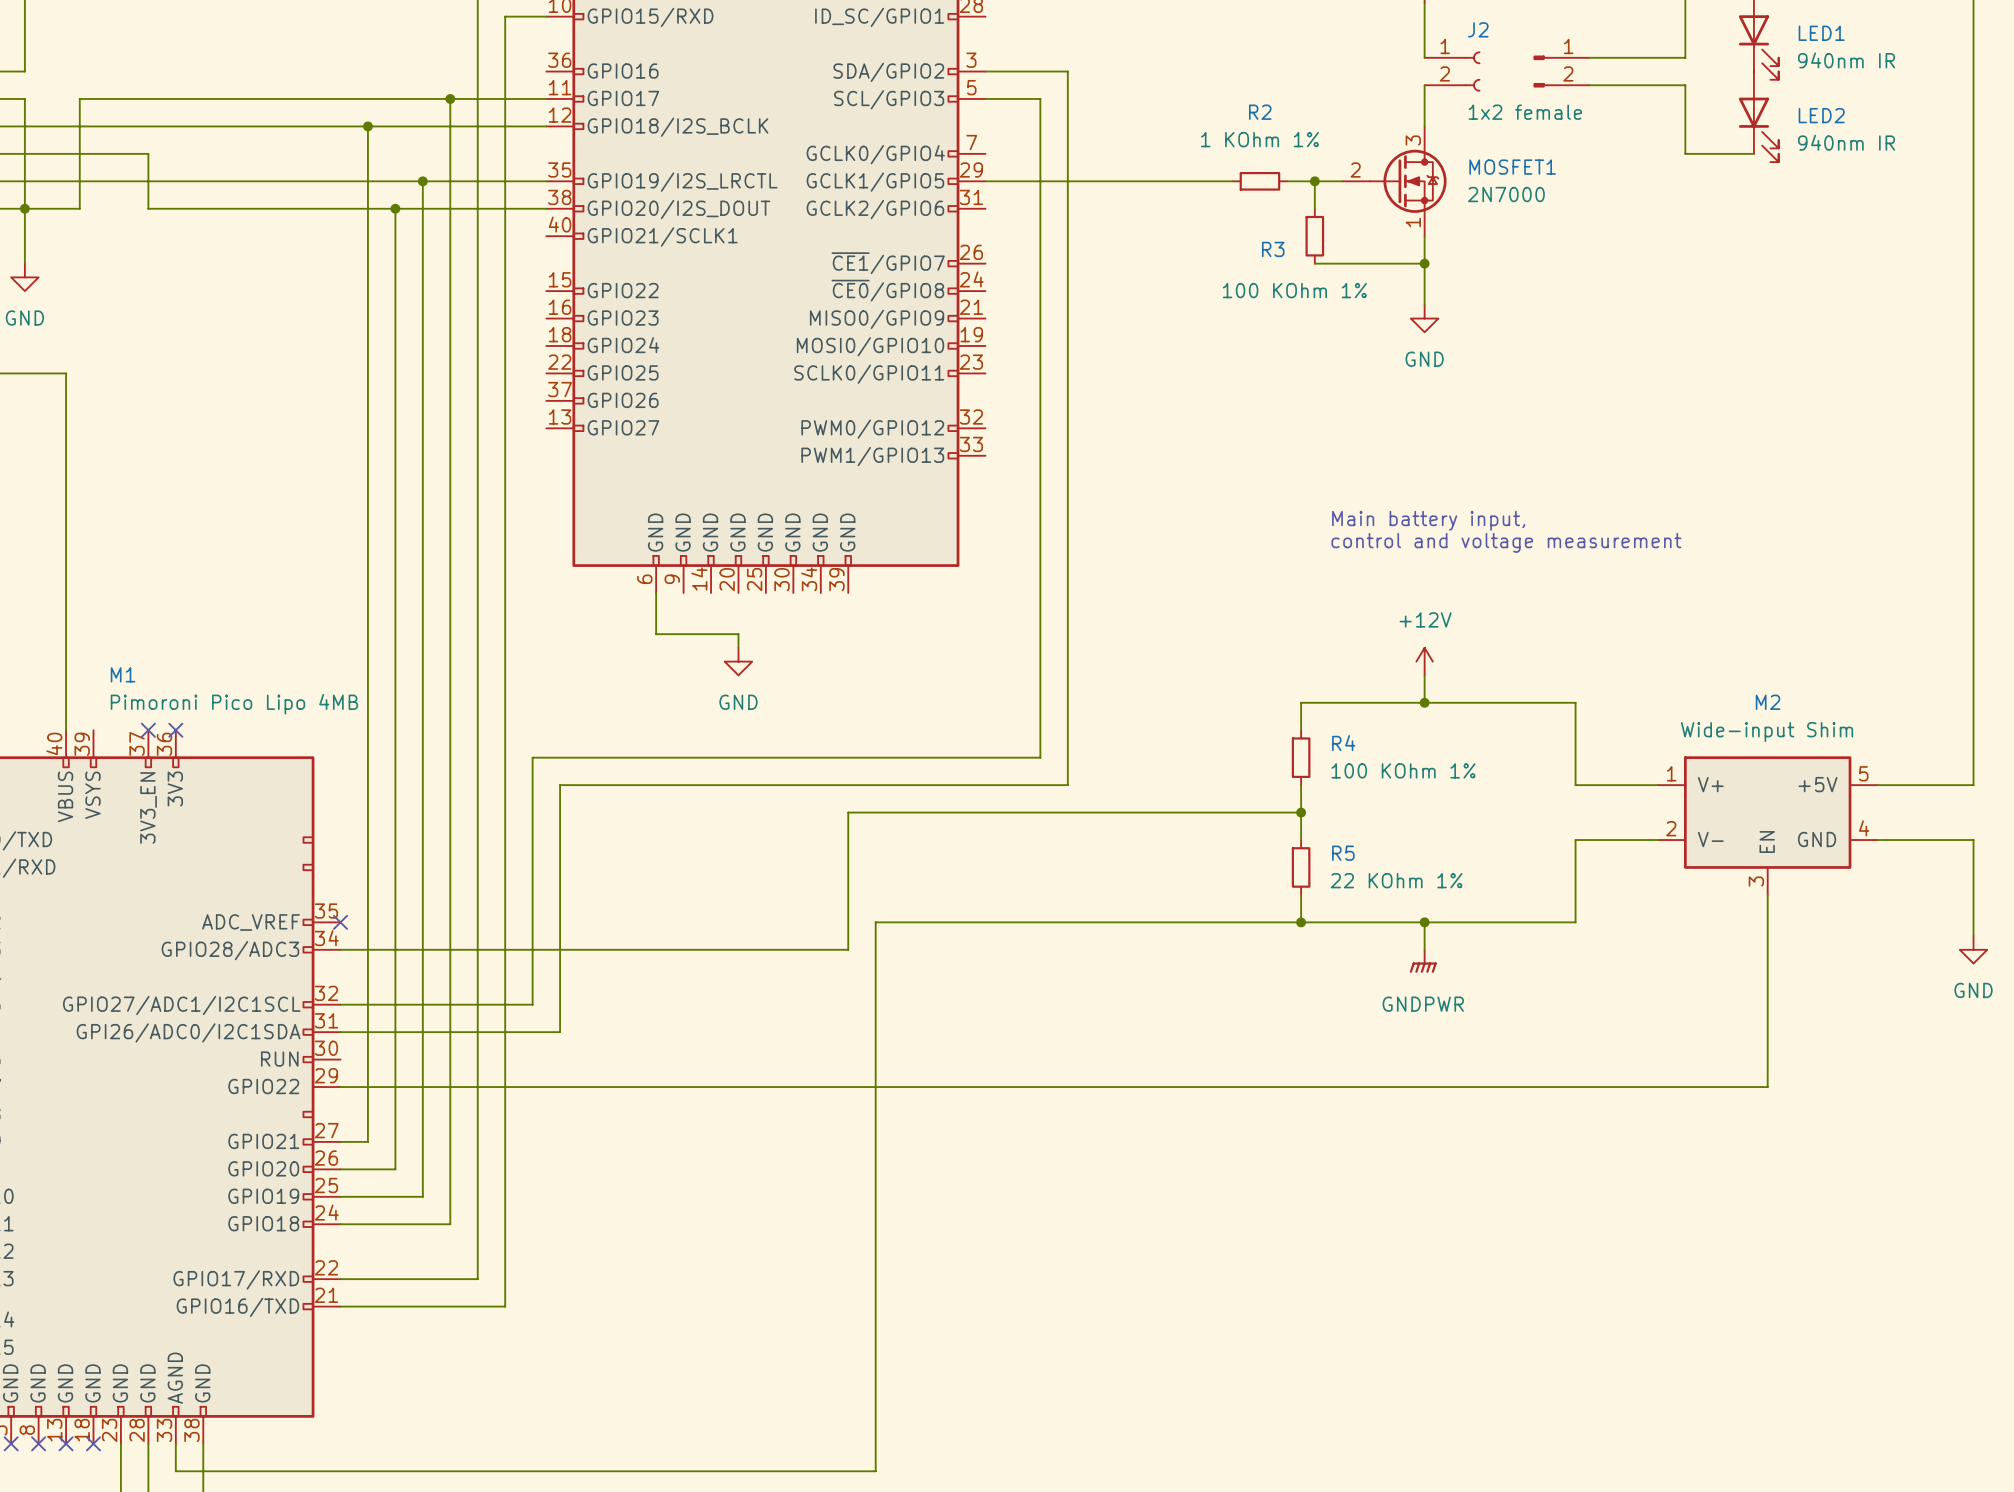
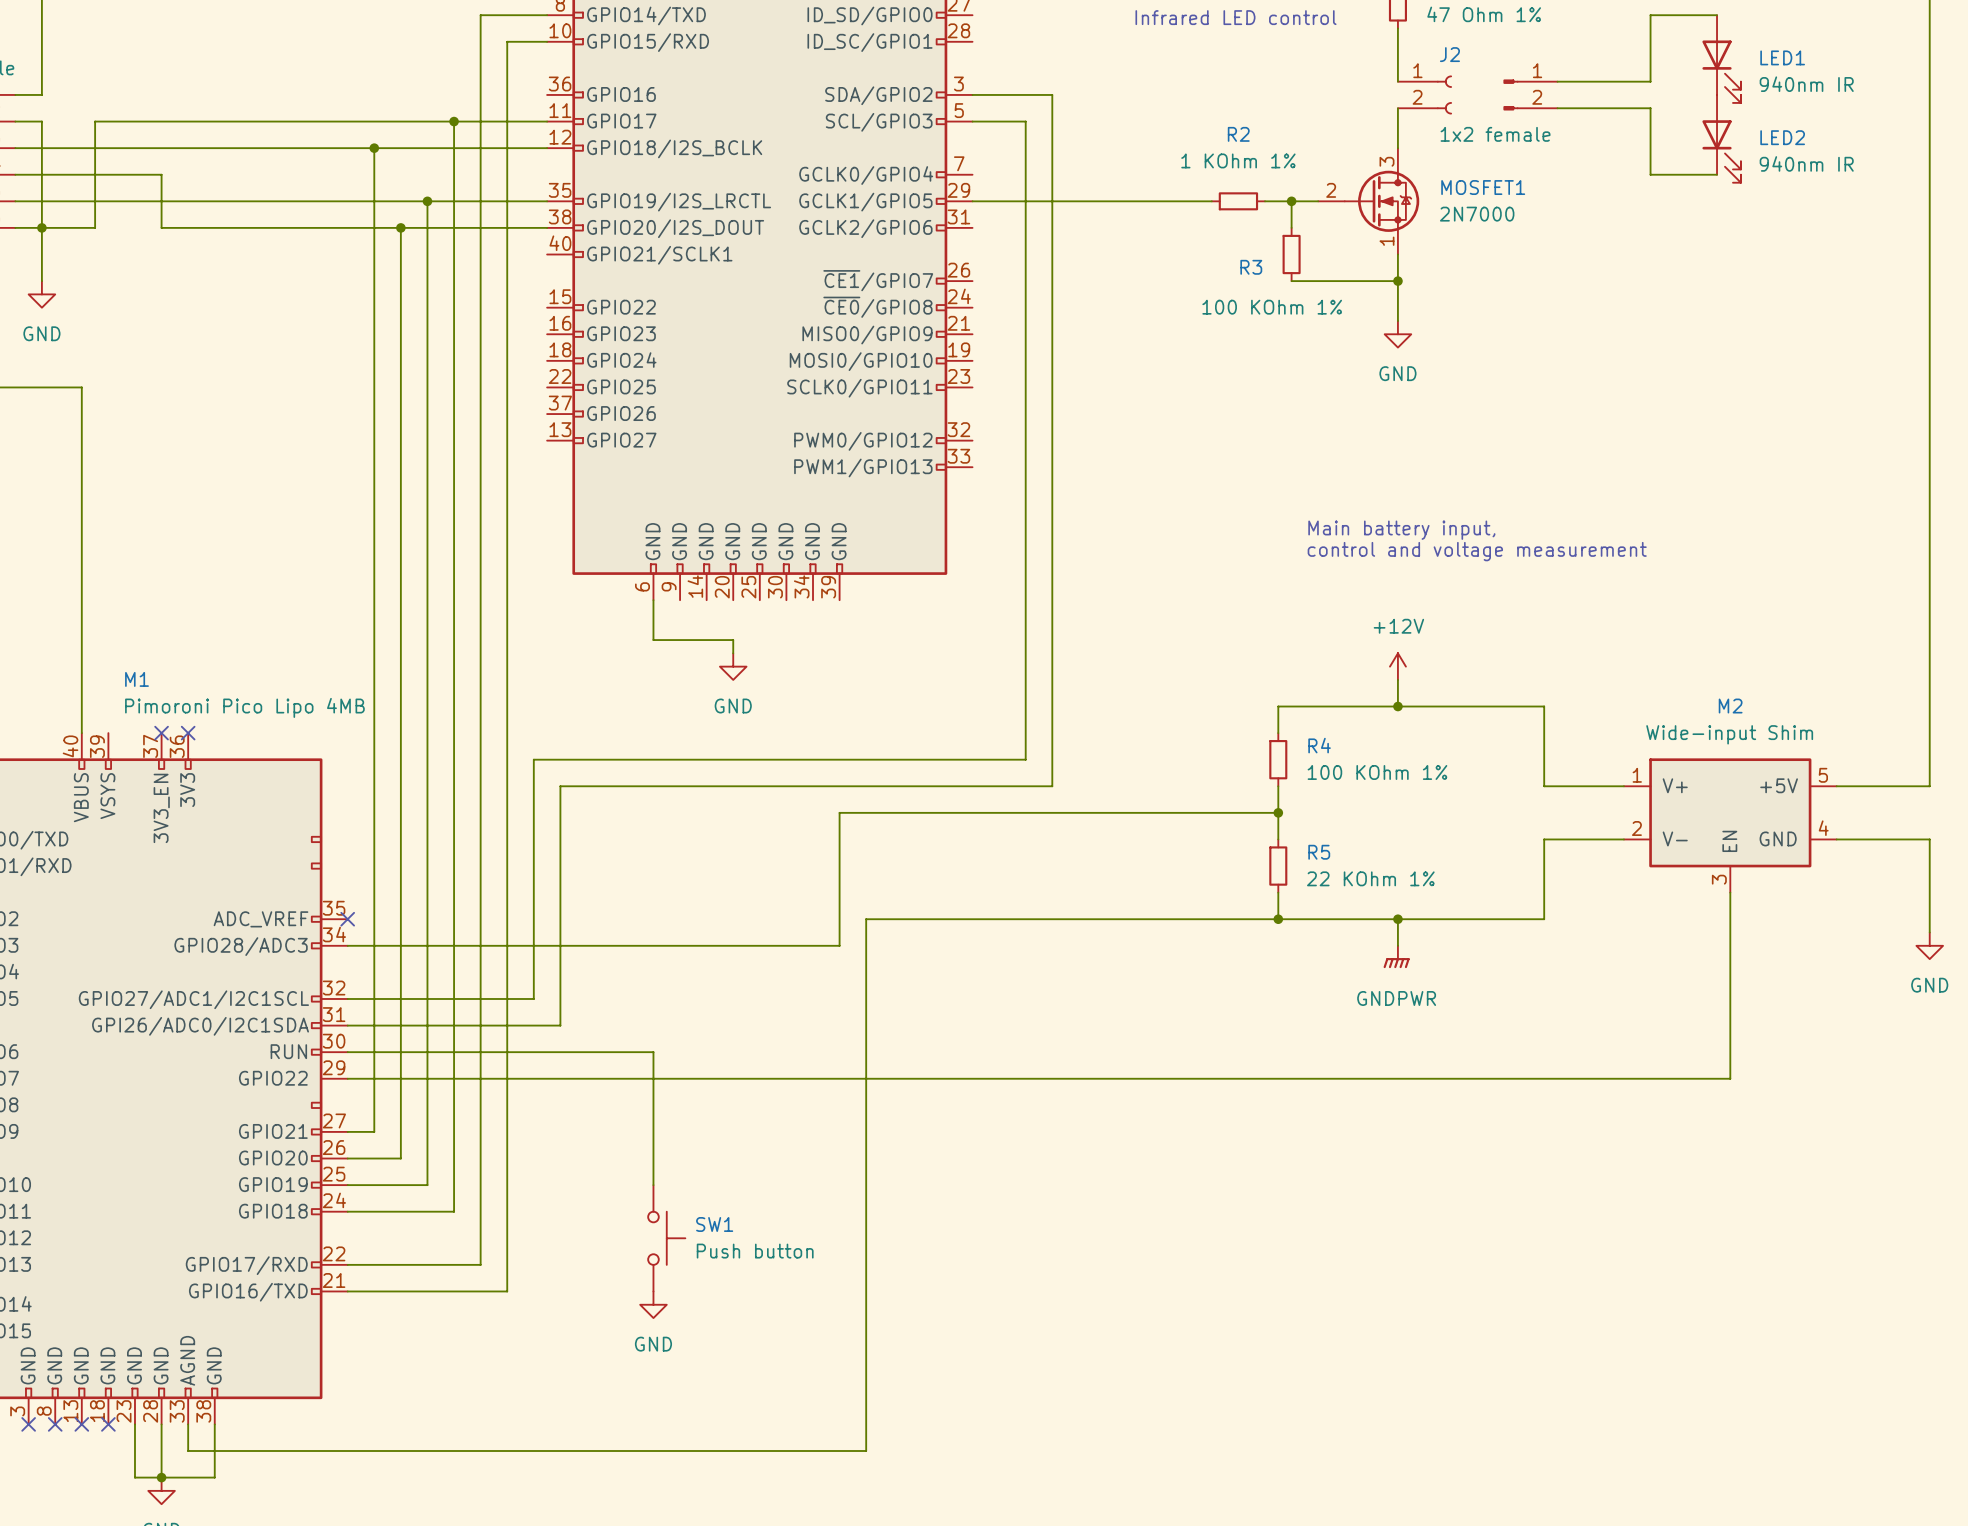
wire: none -> (347, 1052) (653, 1052) (653, 1185)
SW1: none -> Push button (666, 1238)
power symbol: none -> GND (653, 1304)

